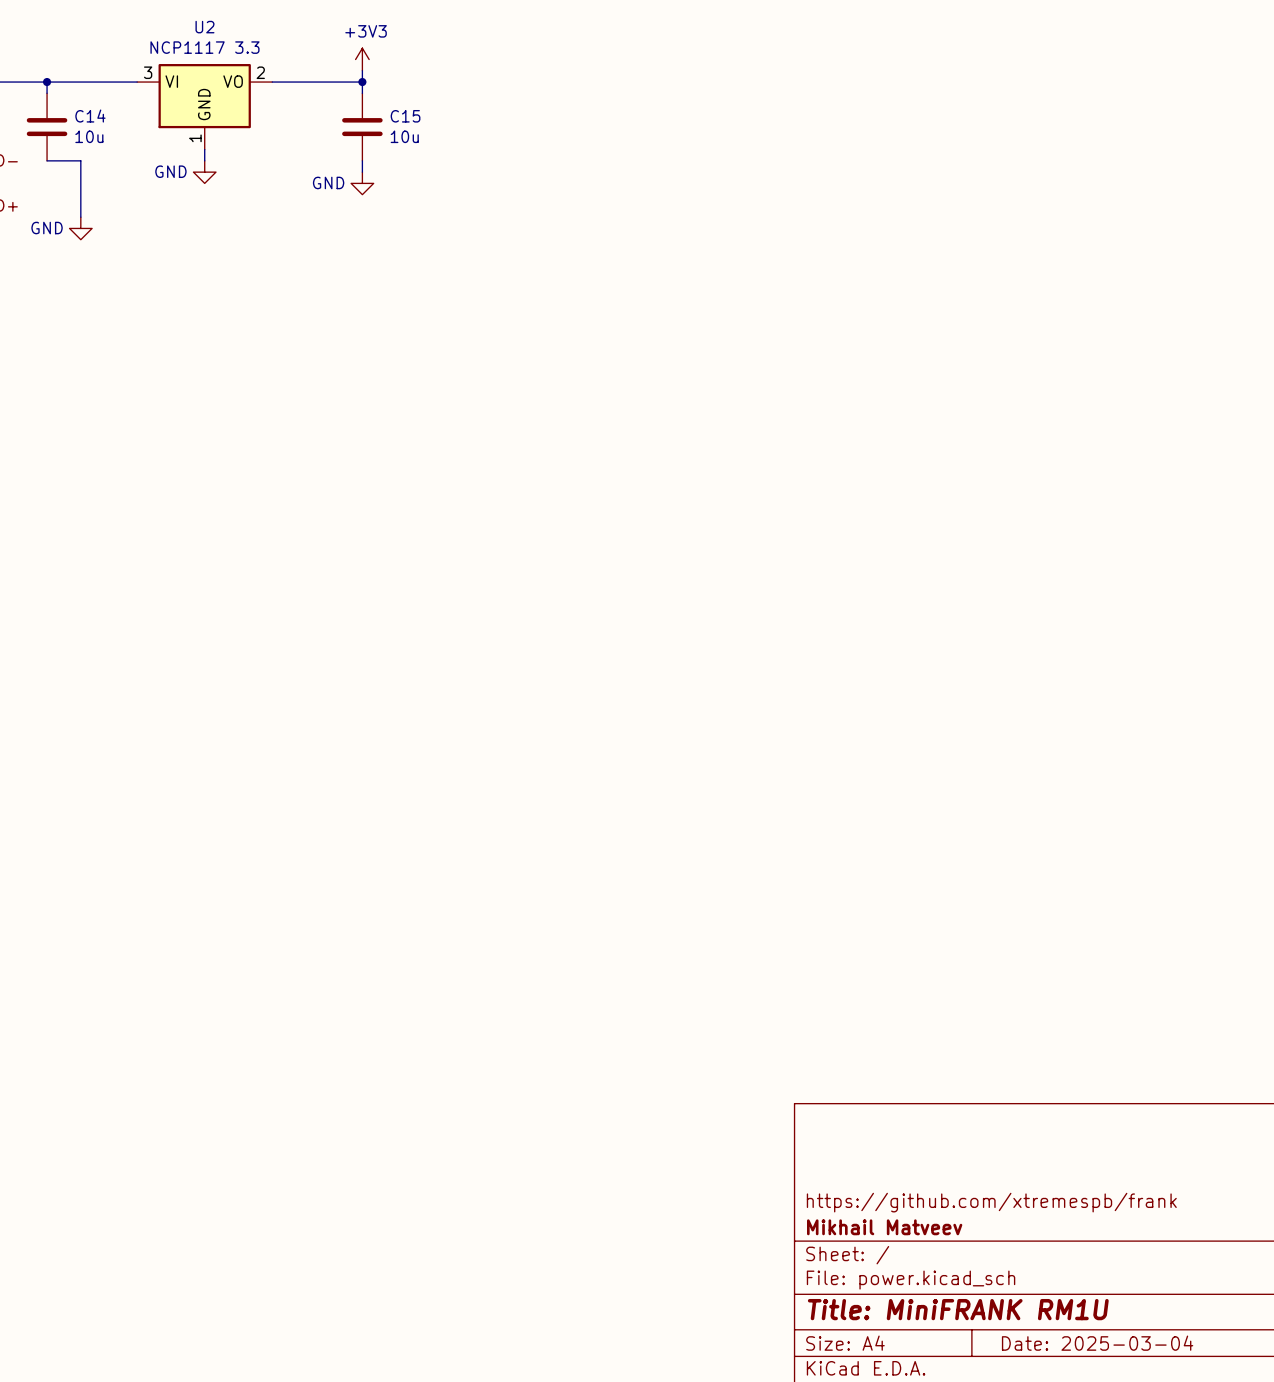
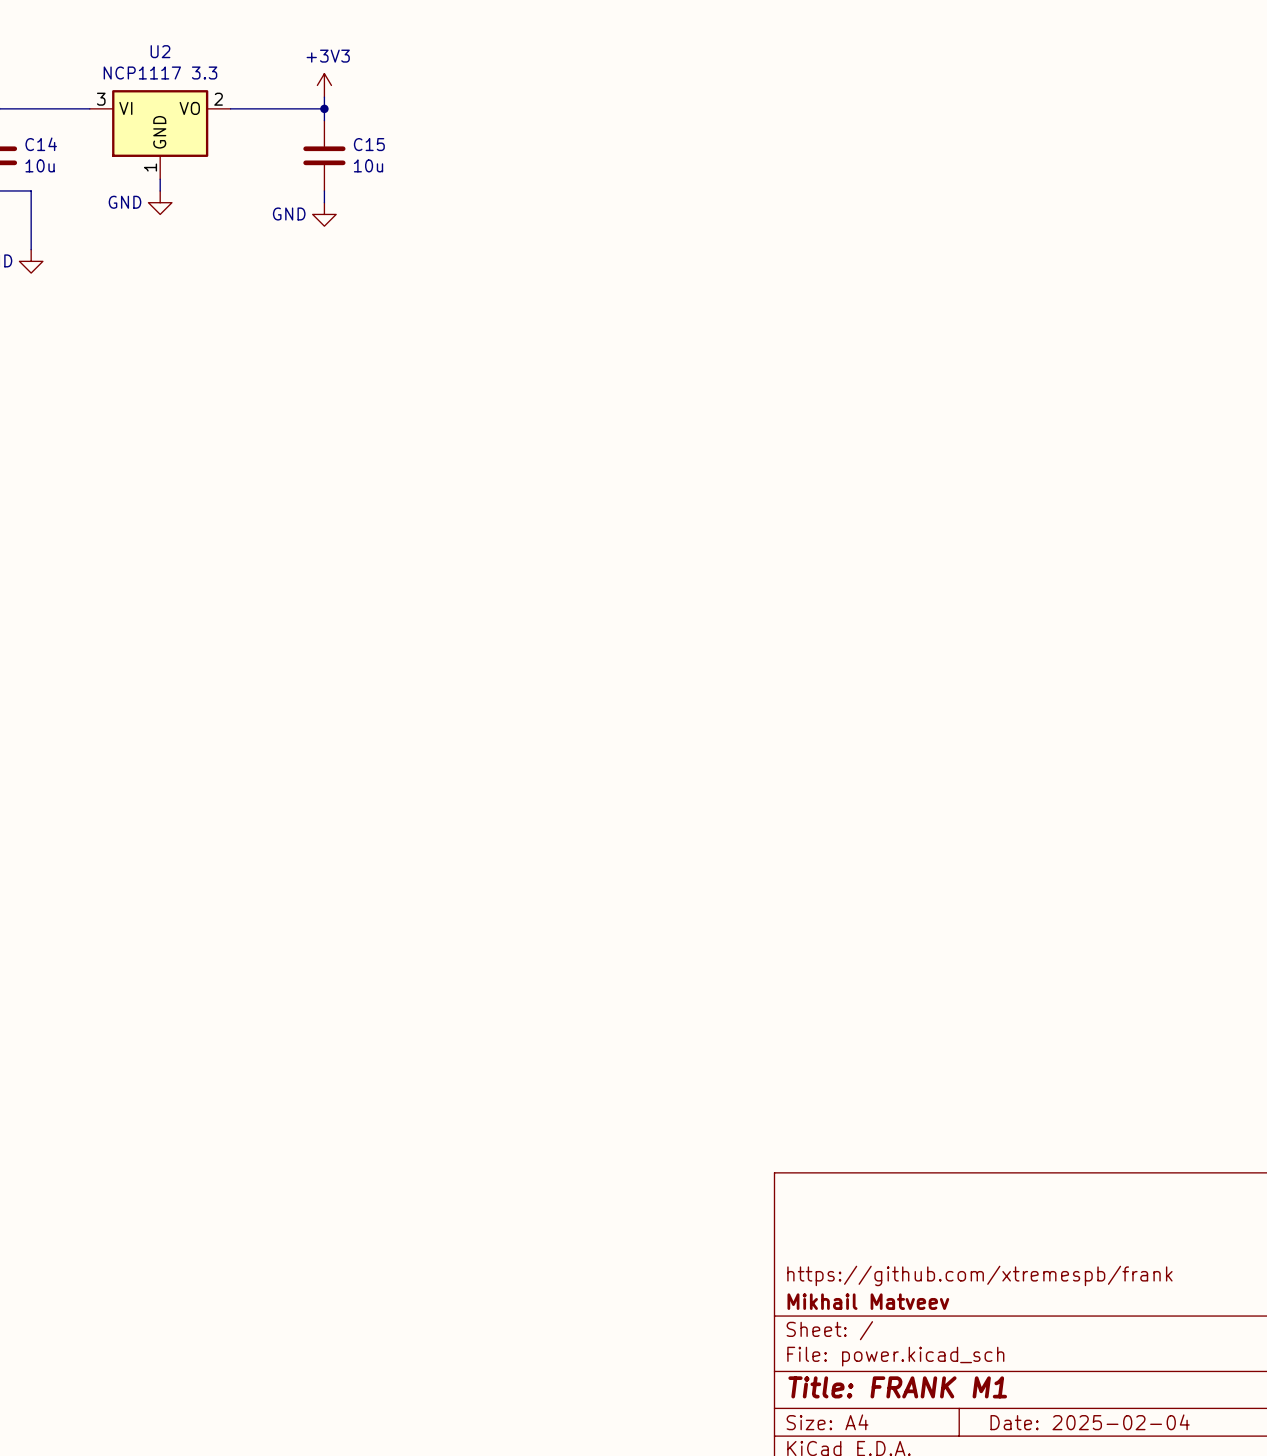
title block: Title: MiniFRANK RM1U (958, 1309) -> Title: FRANK M1 (897, 1387)
title block: Date: 2025-03-04 (1097, 1343) -> Date: 2025-02-04 (1090, 1422)

